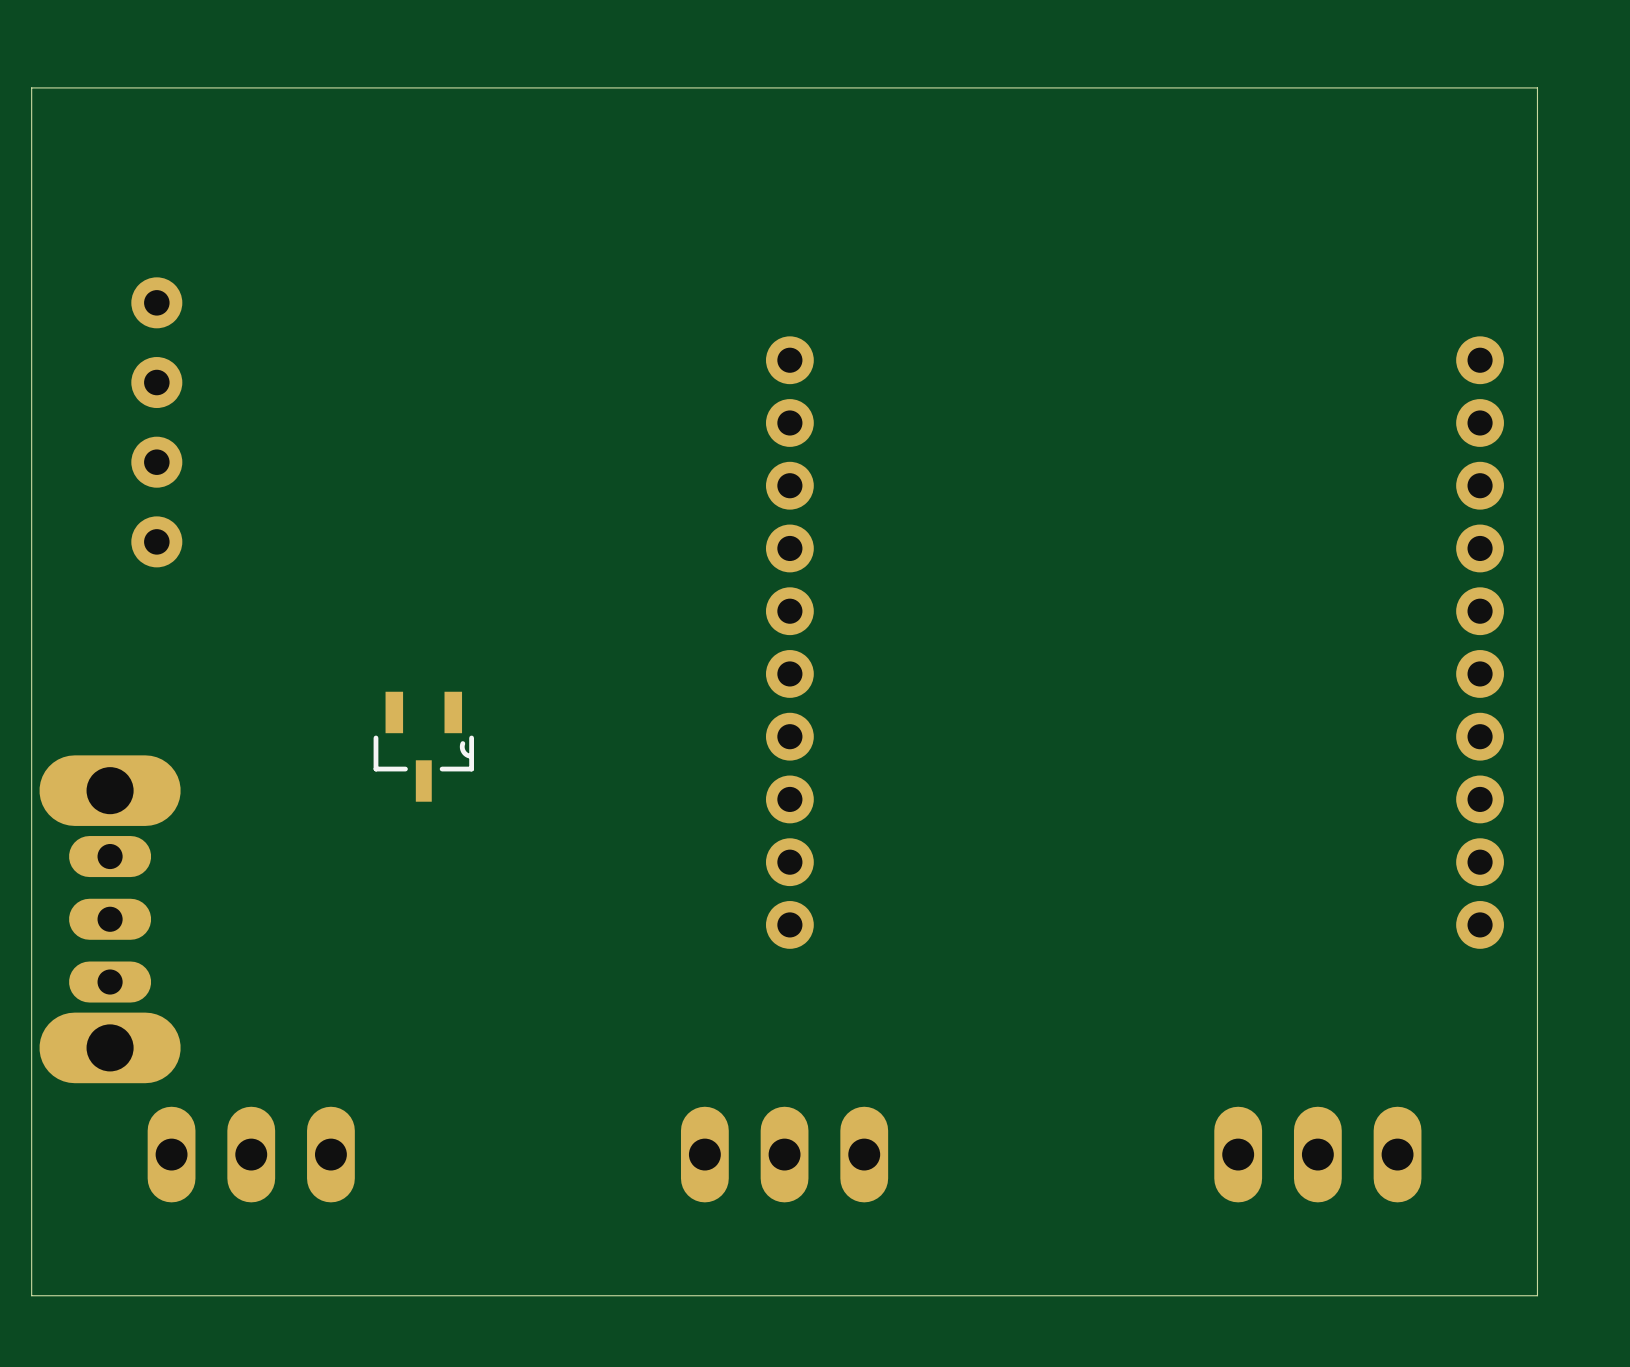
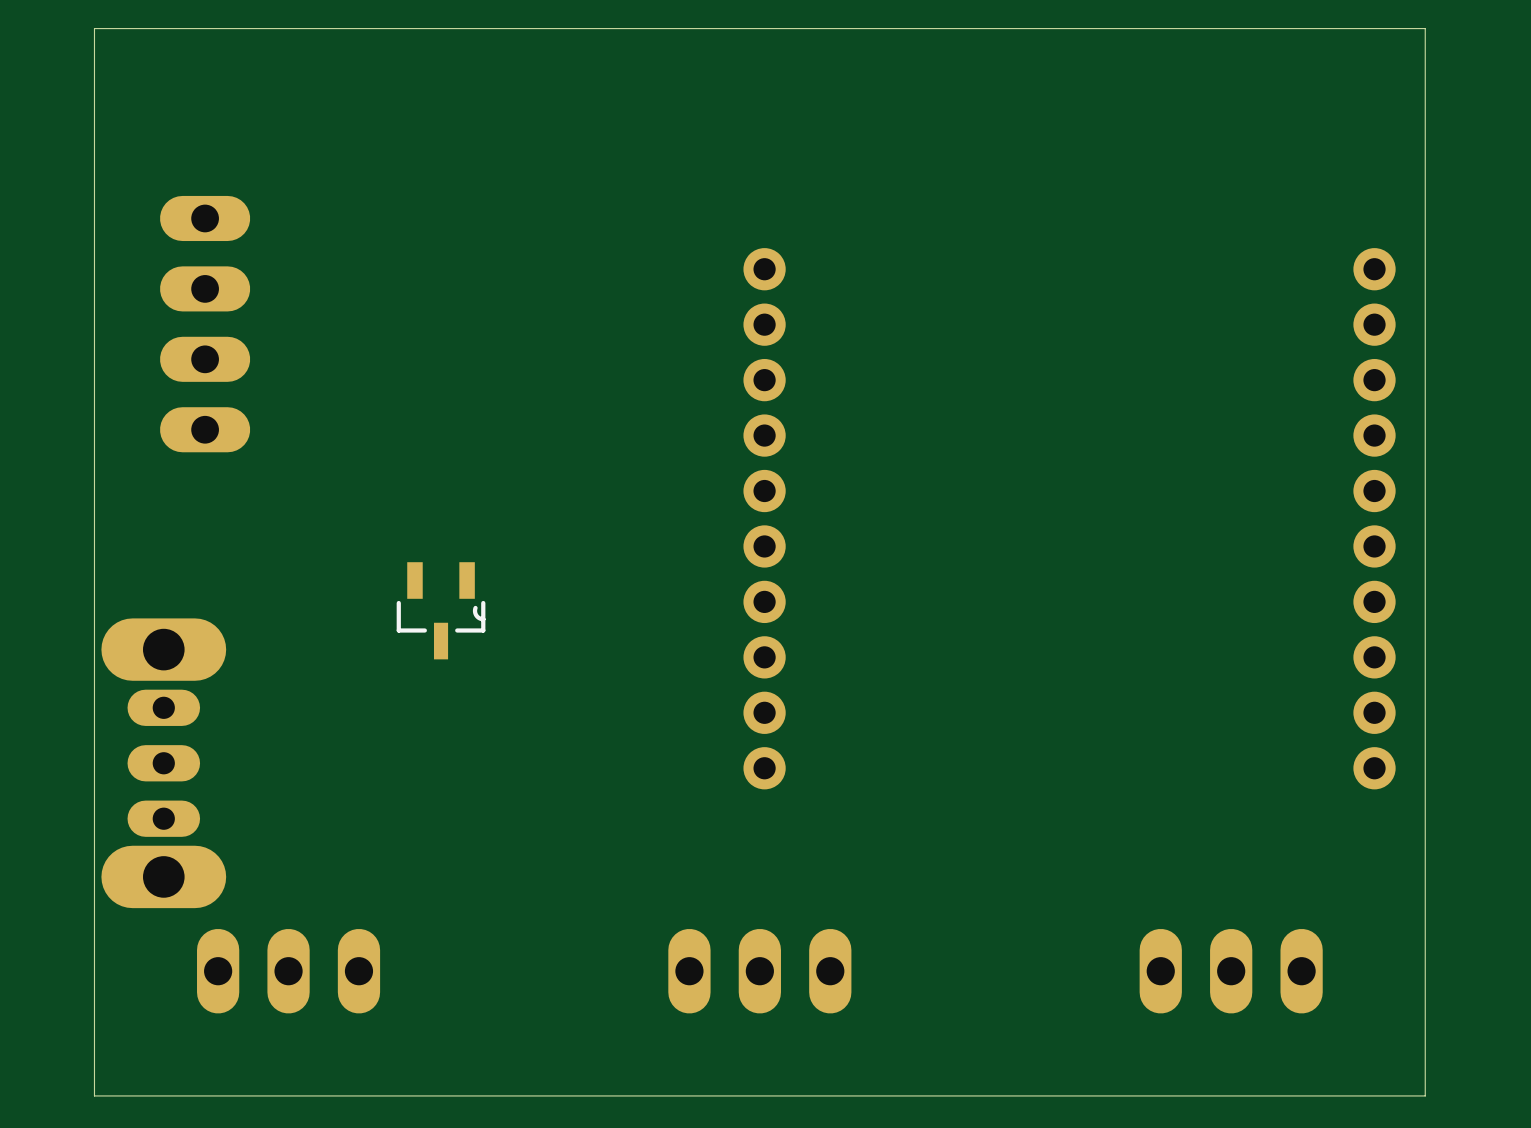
part footprint: [131, 277, 183, 568] -> [160, 195, 251, 453]

